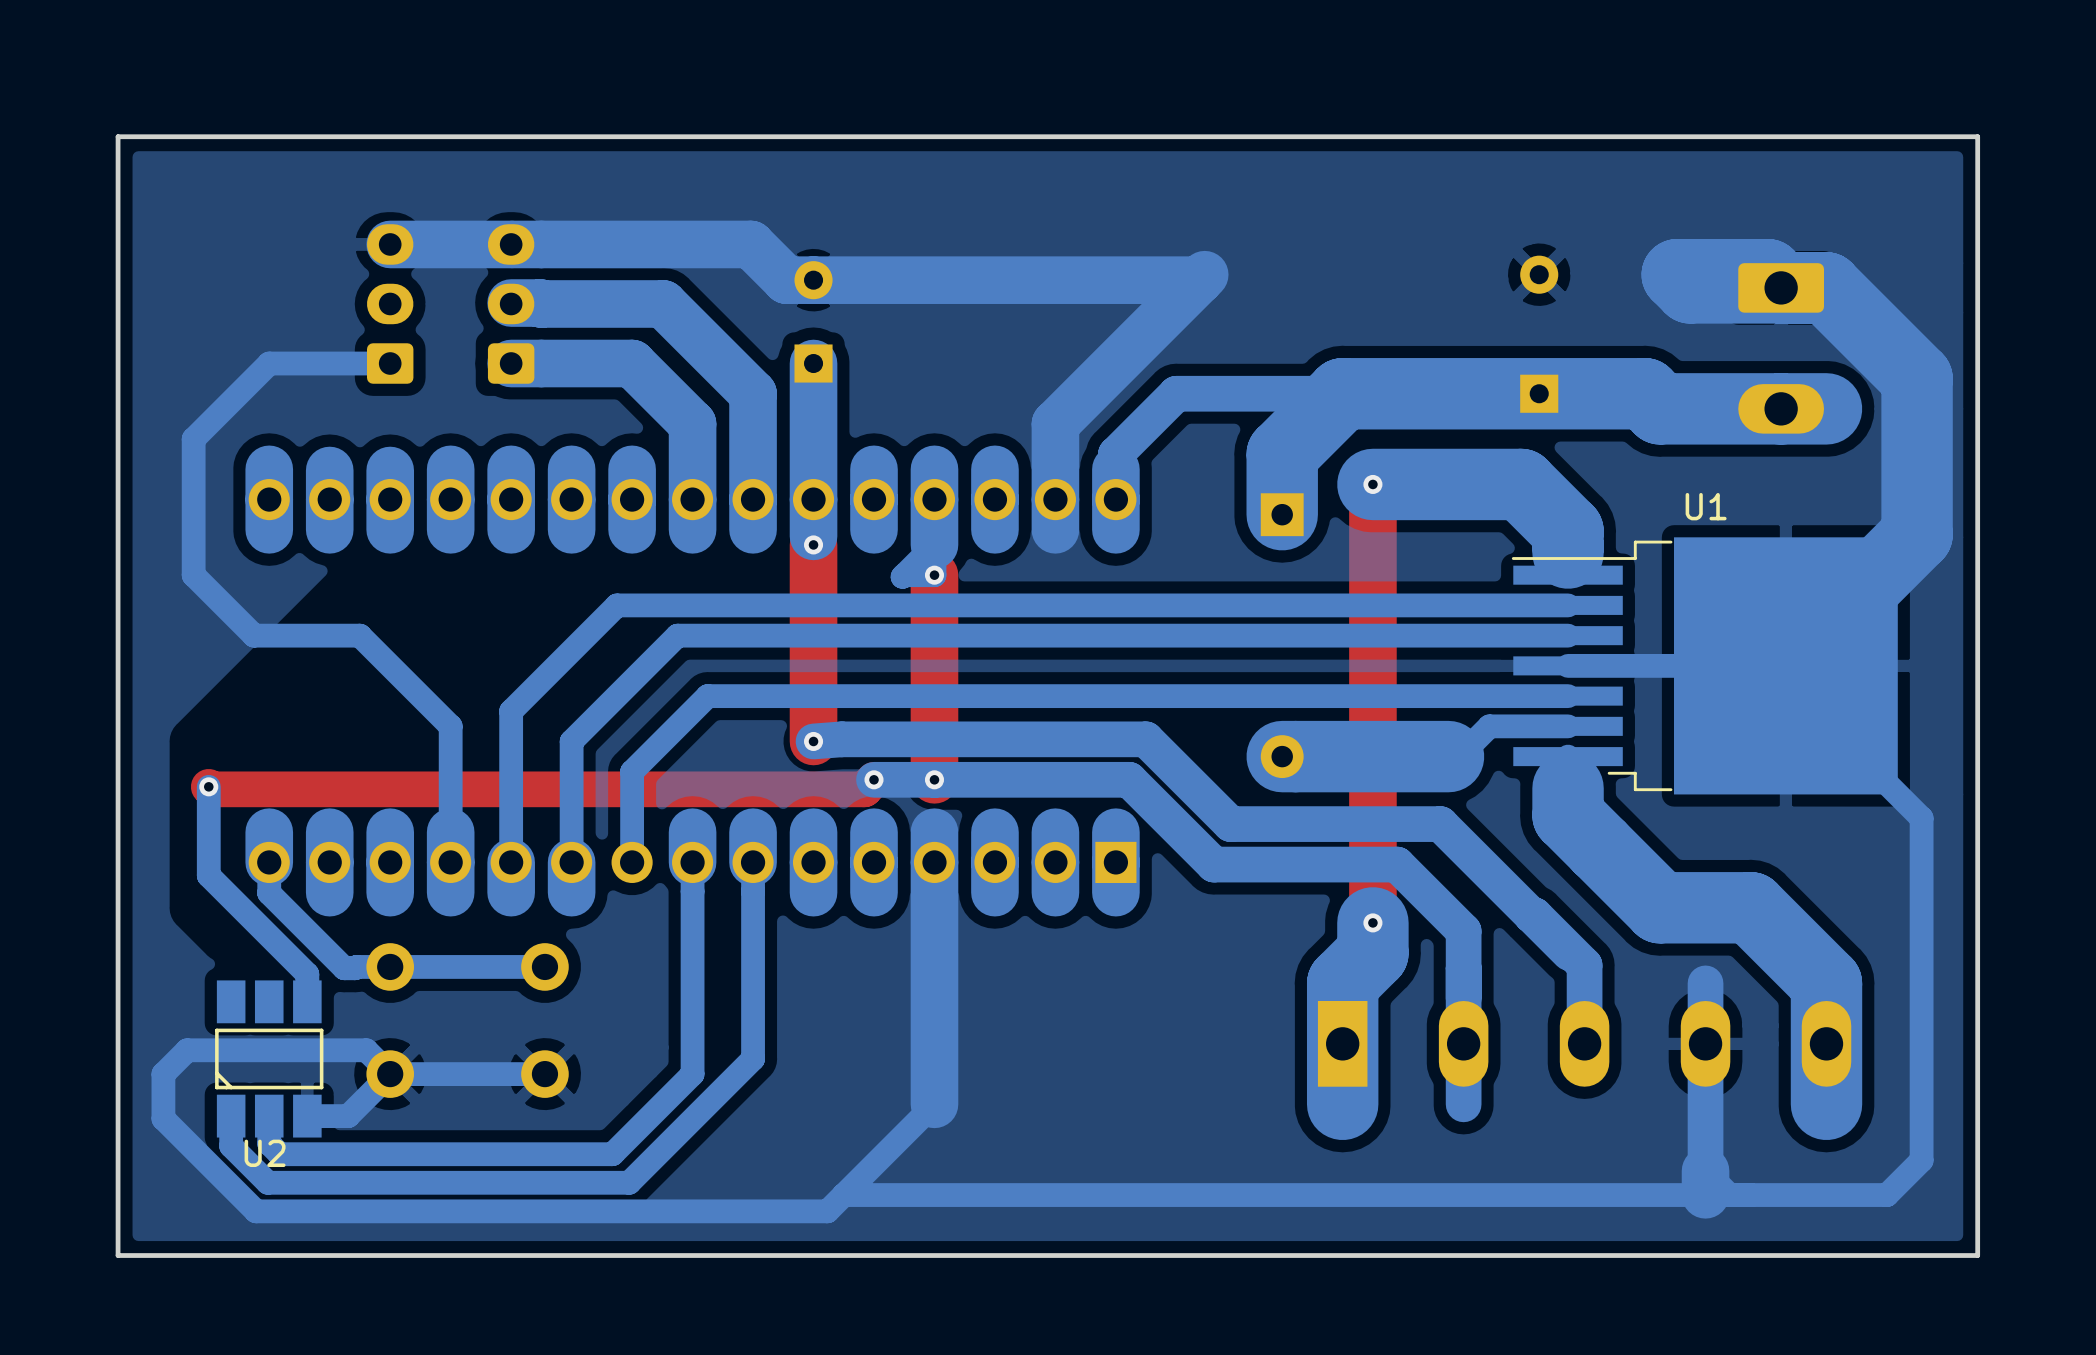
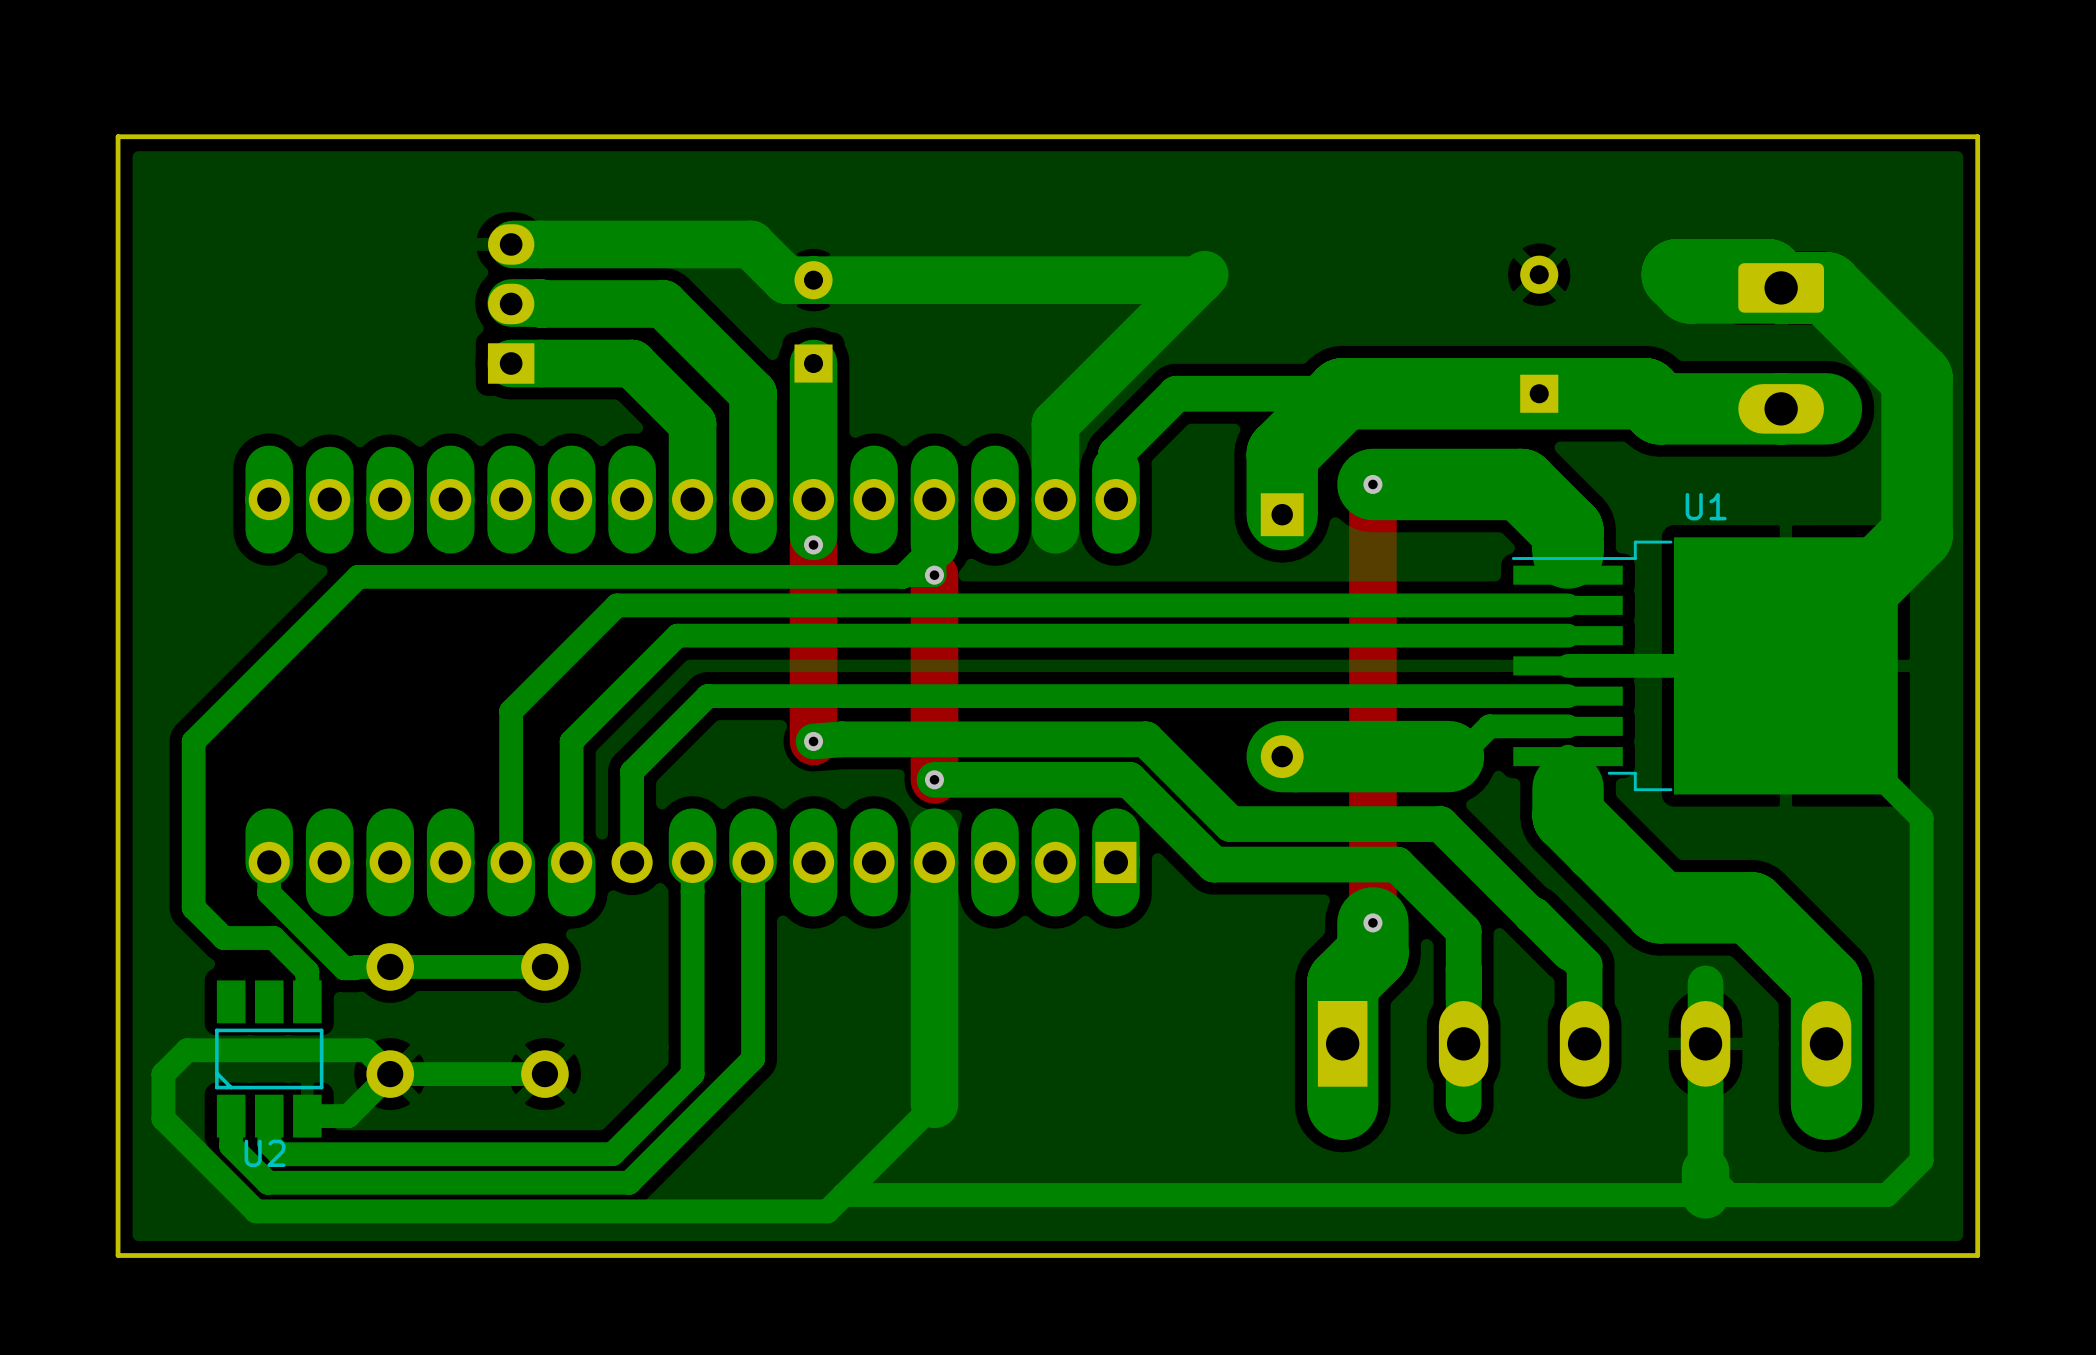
part footprint: [487, 224, 535, 384] -> [487, 224, 535, 384]
bottom track: (511, 244) (390, 244) -> none
part: (390, 303) -> none
bottom track: (390, 363) (269, 363) (193, 439) (193, 575) (254, 635) (359, 635) (450, 726) (450, 862) -> none
top track: (874, 779) (864, 789) (211, 789) (208, 786) -> none
via: (874, 779) -> none
bottom track: (934, 779) (874, 779) -> none
bottom track: (208, 786) (208, 875) (307, 974) -> (902, 576) (358, 576) (193, 741) (193, 907) (223, 938) (273, 938) (307, 971) (307, 974)
via: (208, 786) -> none

